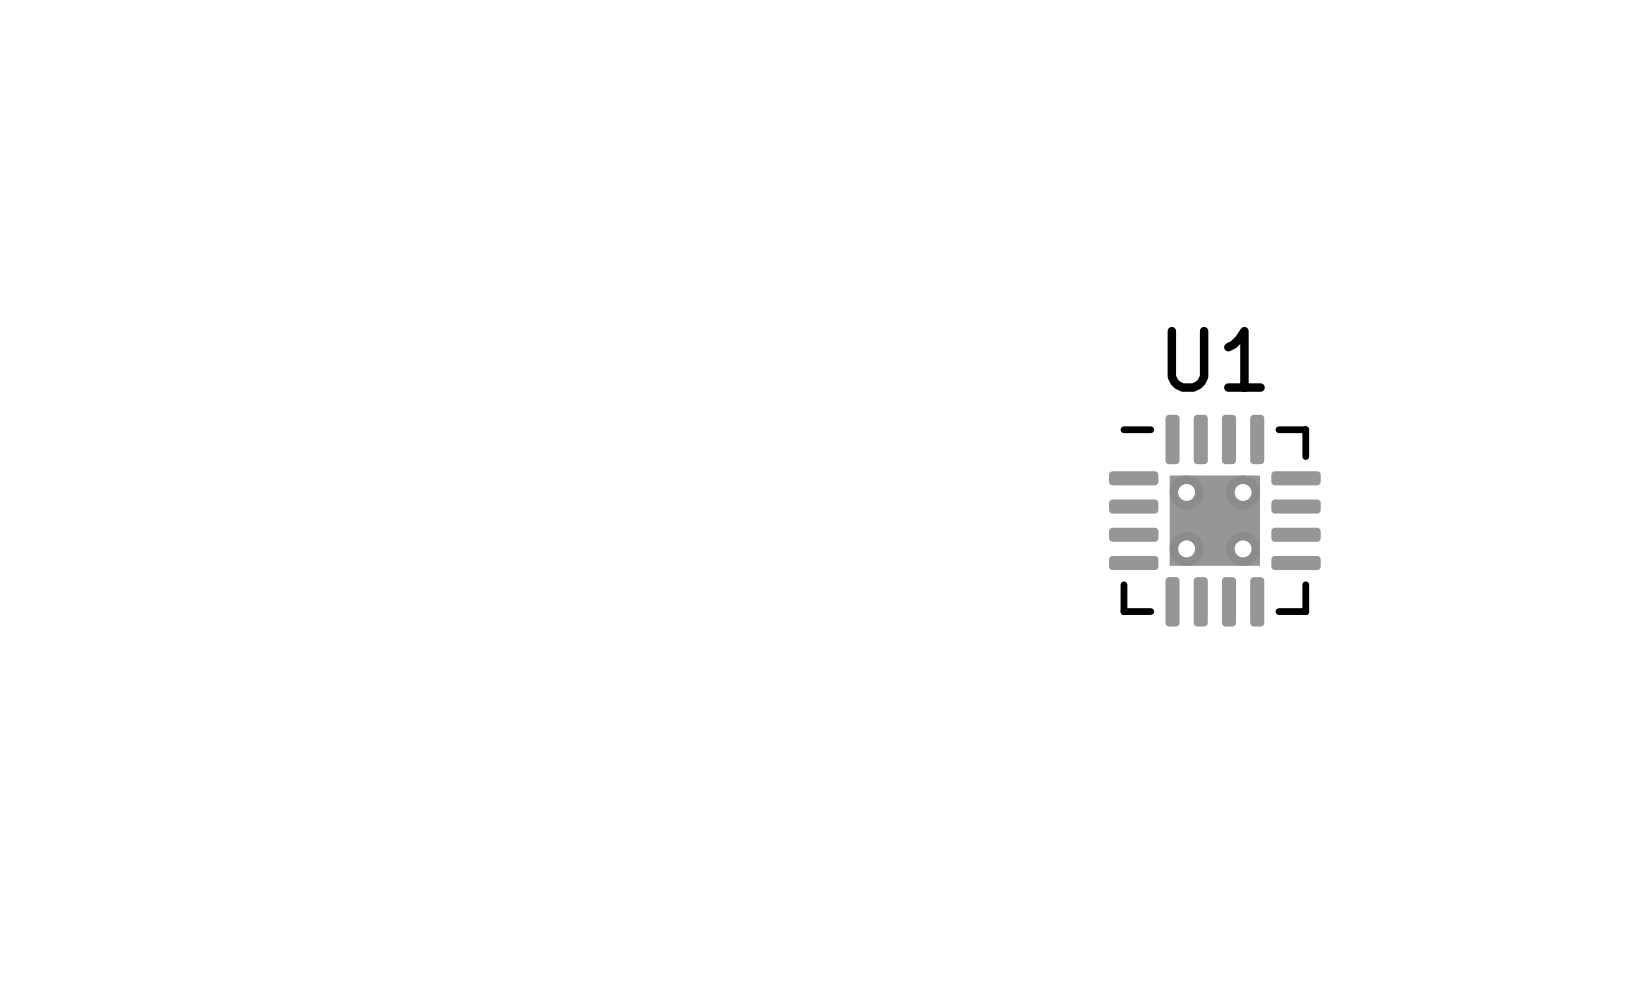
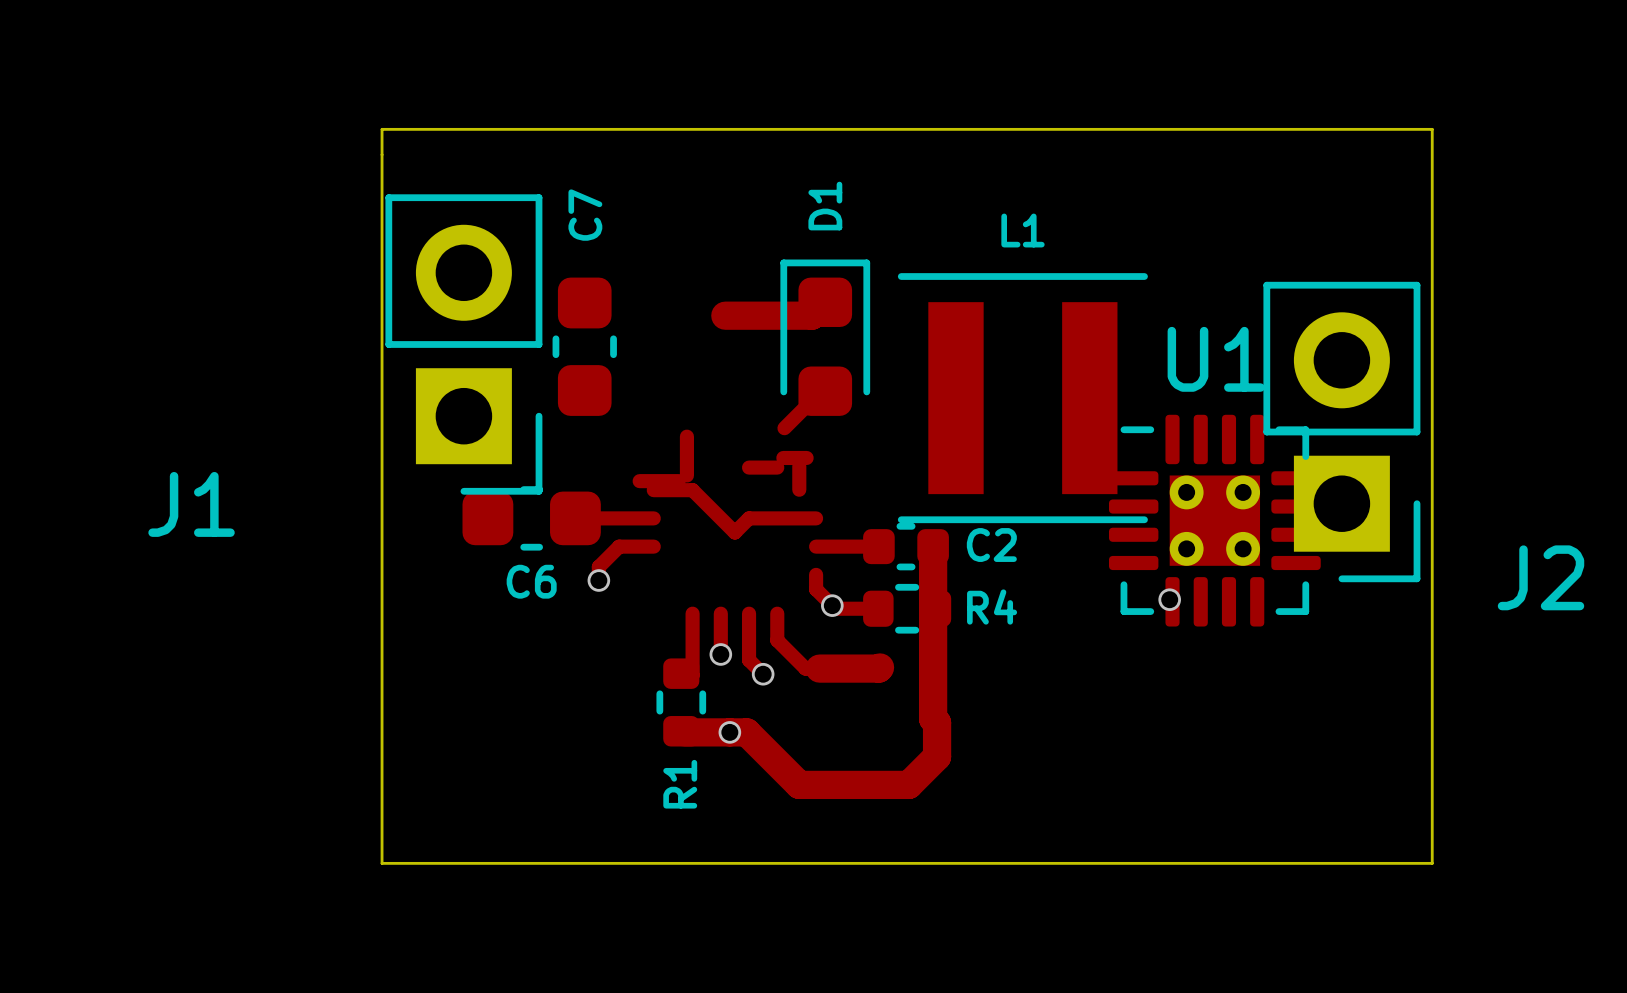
board edge: none -> (382, 129) (382, 863) (1432, 863) (1432, 129) (382, 129)
track: none -> (825, 302) (811, 315) (725, 315)
D1: none -> (825, 337)
J1: none -> (463, 344)
C7: none -> (584, 346)
L1: none -> (1022, 398)
track: none -> (803, 408) (784, 428)
J2: none -> (1341, 432)
track: none -> (686, 436) (686, 475)
track: none -> (783, 457) (806, 457)
track: none -> (799, 466) (799, 489)
track: none -> (749, 467) (777, 467)
track: none -> (639, 481) (678, 481)
track: none -> (653, 490) (692, 490) (734, 532) (749, 518) (816, 518)
C6: none -> (531, 518)
track: none -> (575, 518) (653, 518)
track: none -> (653, 546) (619, 546) (598, 566) (598, 580)
track: none -> (816, 546) (882, 546)
C2: none -> (906, 546)
track: none -> (933, 546) (933, 718) (937, 722) (937, 756) (908, 784) (799, 784) (746, 732) (684, 732)
track: none -> (816, 574) (816, 589) (835, 608) (878, 608)
via: none -> (598, 580)
via: none -> (1169, 599)
via: none -> (832, 605)
R4: none -> (907, 608)
track: none -> (692, 613) (692, 675) (688, 679)
track: none -> (720, 613) (720, 654)
track: none -> (749, 613) (749, 660) (763, 674)
track: none -> (777, 613) (777, 640) (805, 668) (880, 667)
via: none -> (720, 654)
via: none -> (763, 674)
R1: none -> (681, 702)
via: none -> (729, 732)

